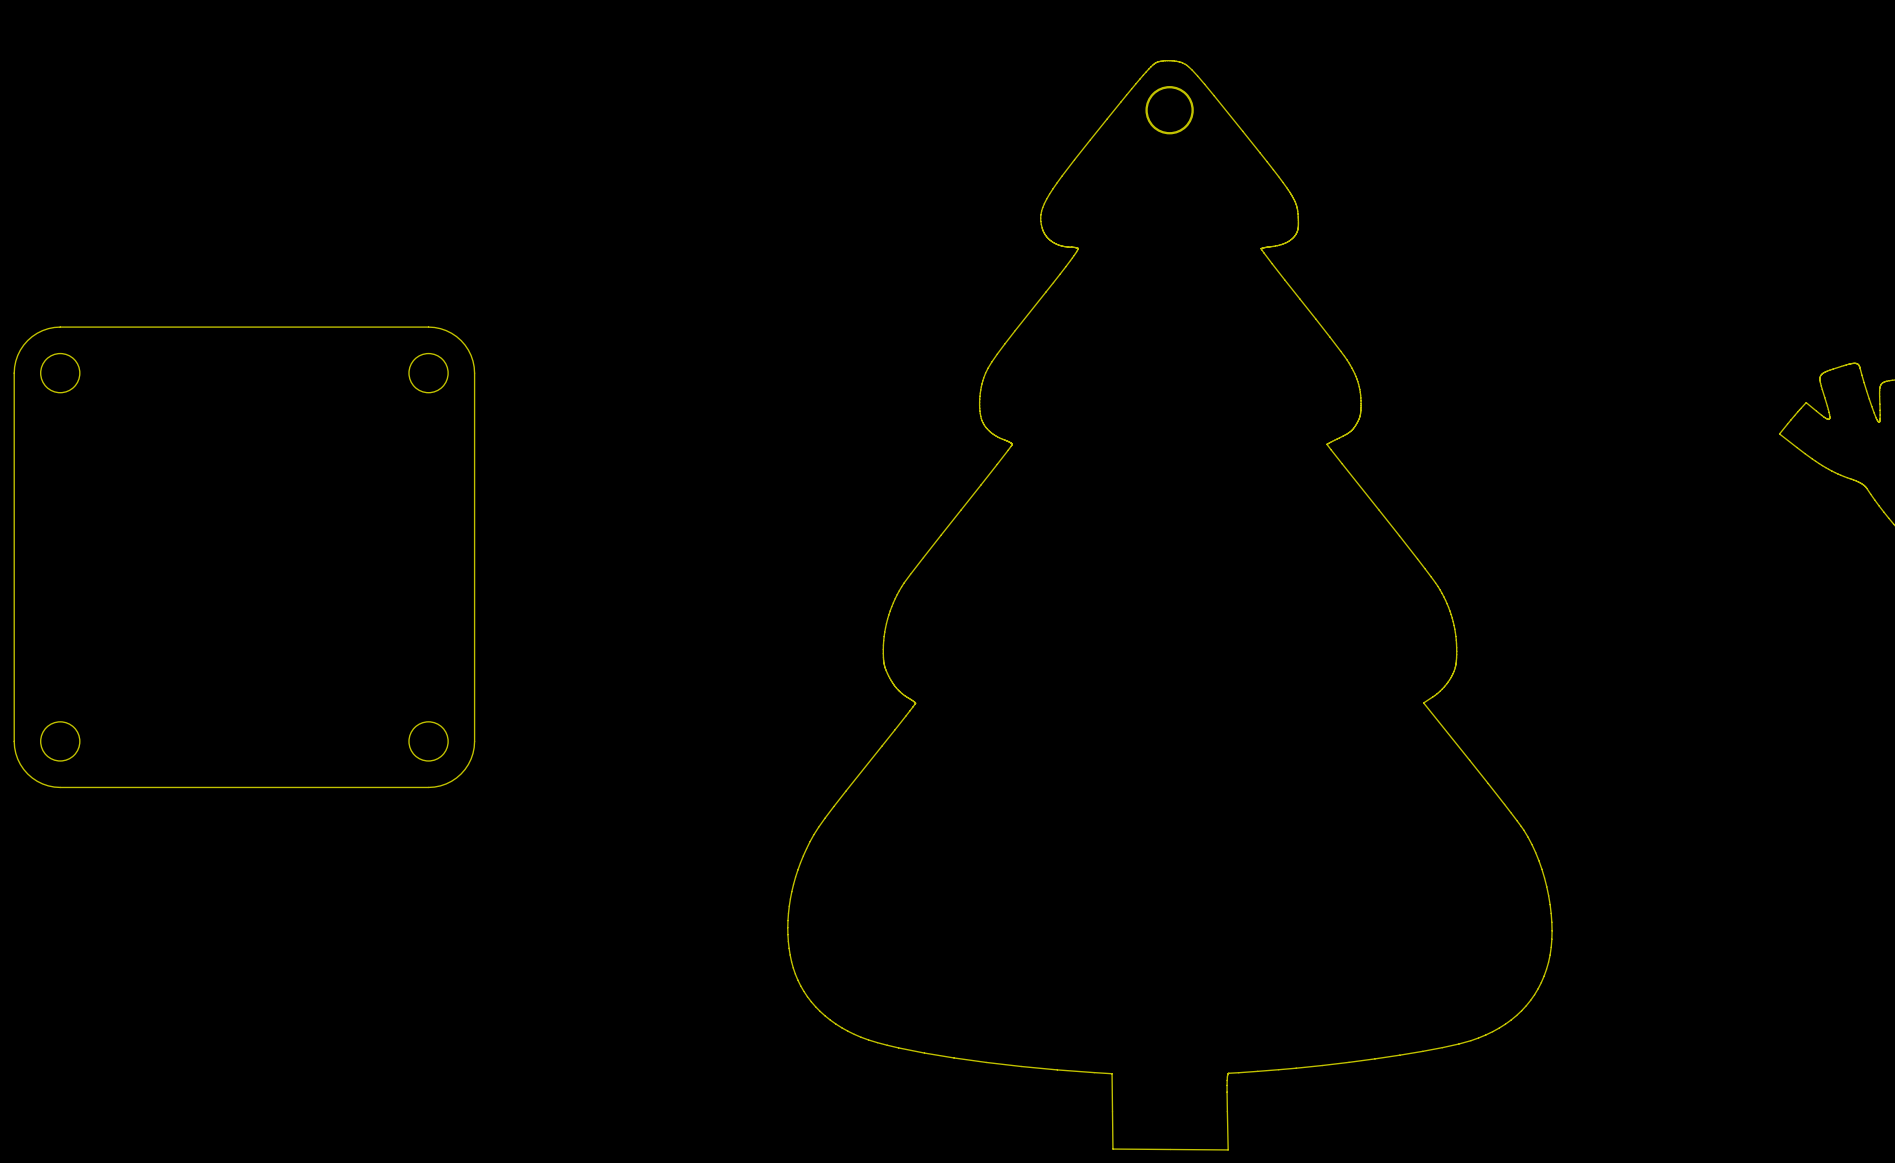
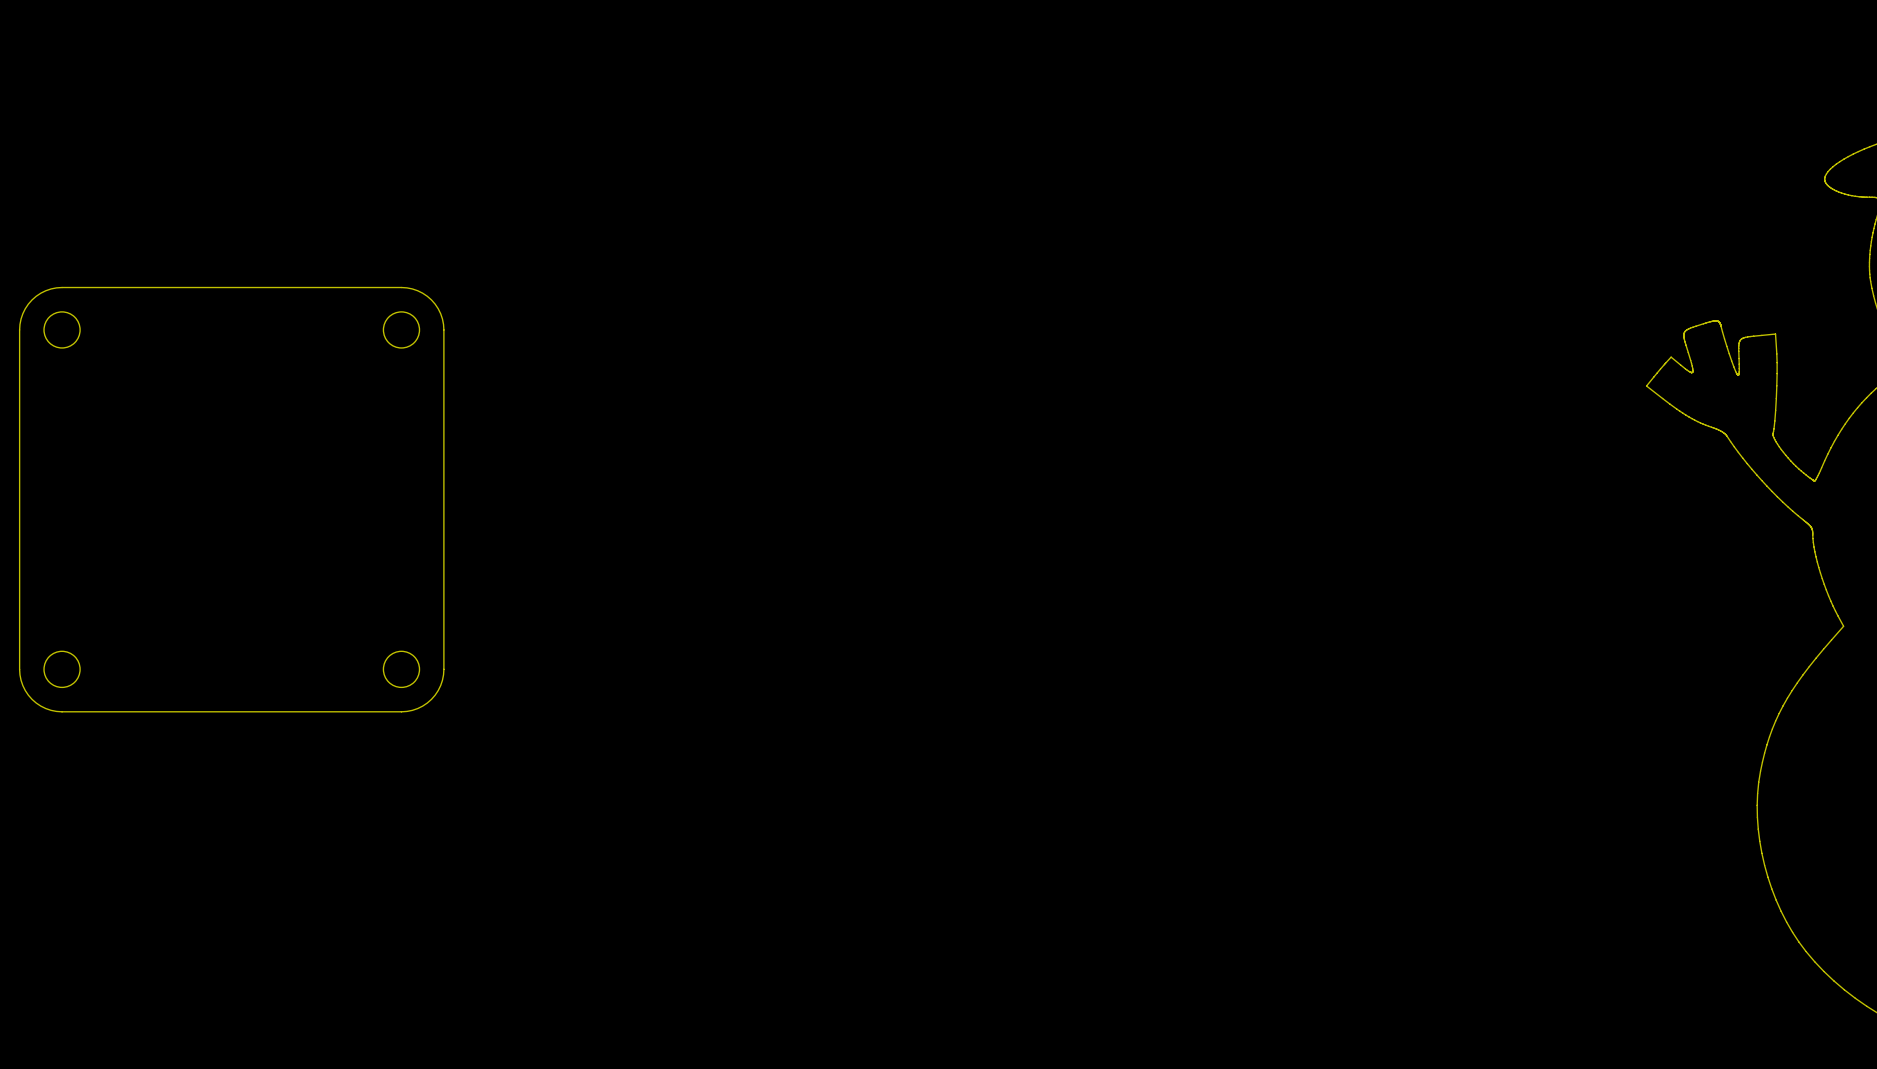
round board edge: [1145, 86, 1194, 135] -> none
board edge: (1078, 248) (997, 354) (983, 378) (979, 399) (982, 420) (991, 432) (1012, 444) -> none
board edge: (1261, 248) (1284, 243) (1295, 234) (1298, 218) (1294, 199) (1273, 169) (1197, 75) (1185, 64) (1169, 60) (1155, 62) (1143, 75) (1074, 159) (1044, 203) (1040, 221) (1046, 235) (1057, 244) (1078, 248) -> none
board edge: (1261, 248) (1344, 356) (1357, 381) (1361, 403) (1358, 420) (1349, 432) (1327, 444) -> none
board edge: (1012, 444) (910, 574) (891, 606) (884, 636) (884, 665) (896, 688) (915, 702) -> none
board edge: (1326, 444) (1424, 568) (1443, 596) (1454, 629) (1455, 665) (1445, 685) (1423, 702) (1523, 830) (1535, 852) (1544, 877) (1550, 904) (1552, 930) (1550, 955) (1546, 969) (1530, 1000) (1516, 1015) (1499, 1028) (1471, 1040) (1422, 1051) (1322, 1065) (1228, 1073) (1228, 1149) (1112, 1149) (1112, 1073) (1021, 1066) (954, 1057) (887, 1045) (847, 1031) (830, 1020) (815, 1006) (803, 991) (795, 974) (790, 955) (787, 934) (791, 891) (803, 855) (818, 827) (915, 703) -> none

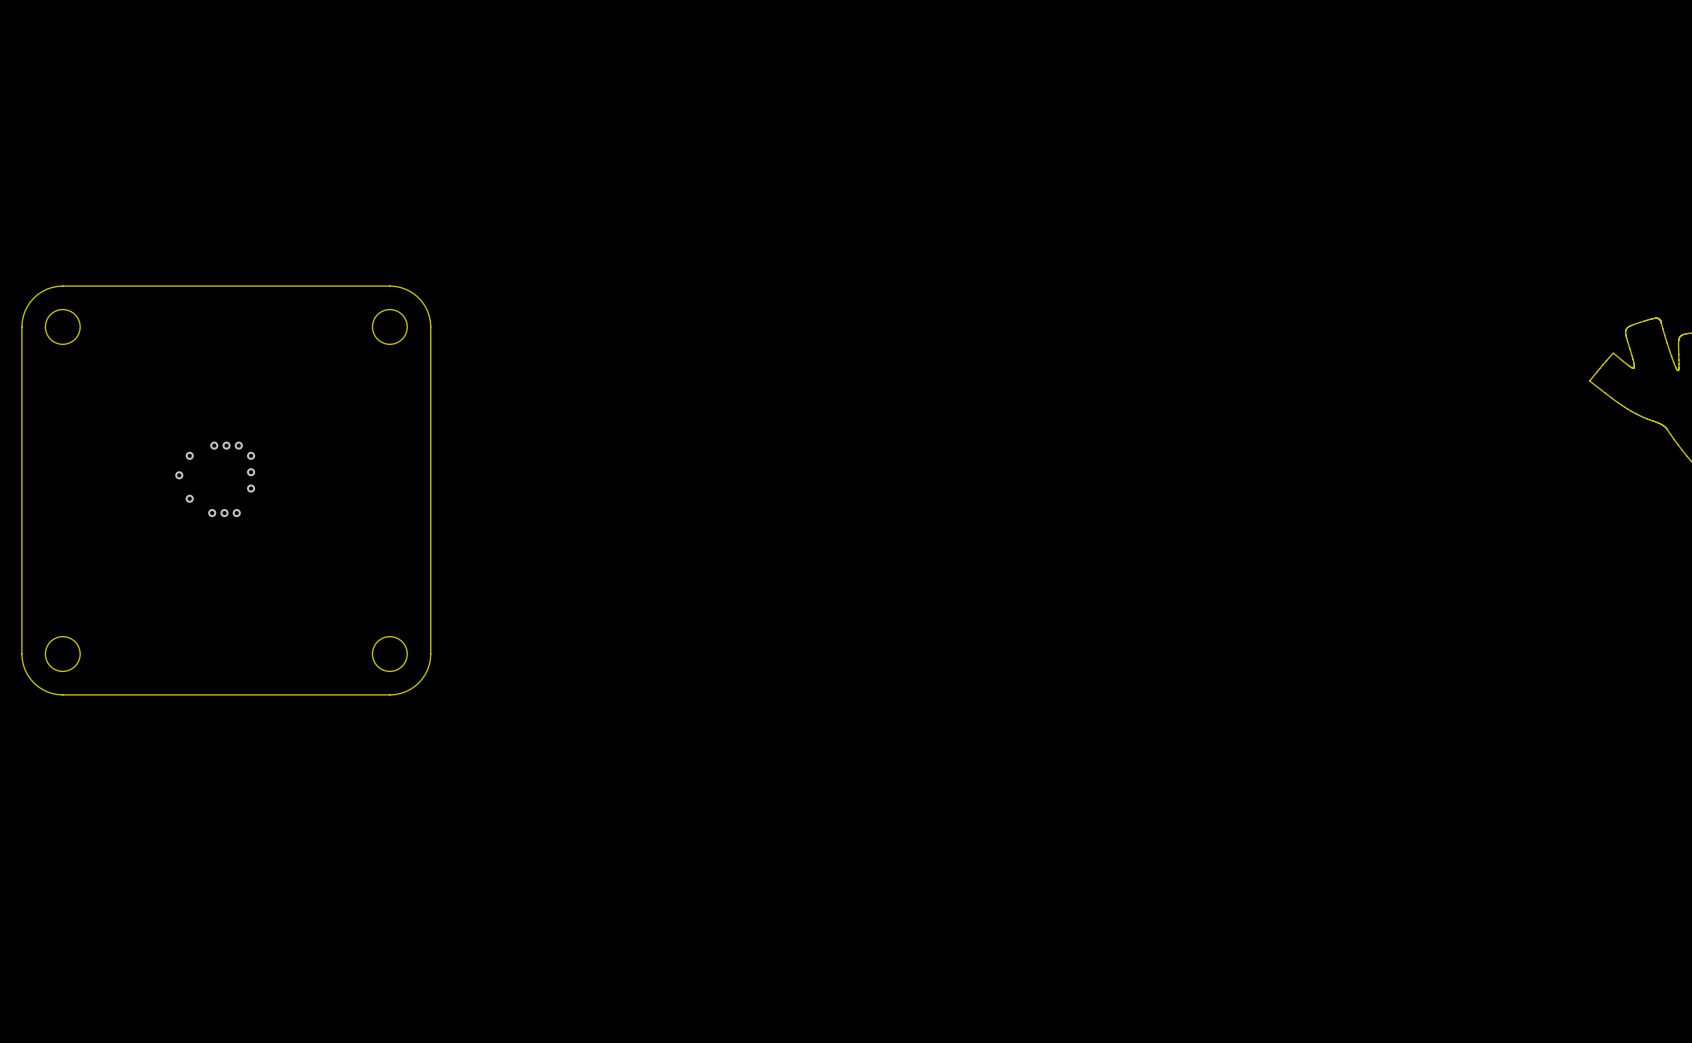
via: none -> (214, 445)
via: none -> (226, 445)
via: none -> (238, 445)
via: none -> (189, 455)
via: none -> (251, 455)
via: none -> (251, 472)
via: none -> (179, 475)
via: none -> (251, 488)
via: none -> (189, 498)
via: none -> (212, 513)
via: none -> (224, 513)
via: none -> (236, 513)

